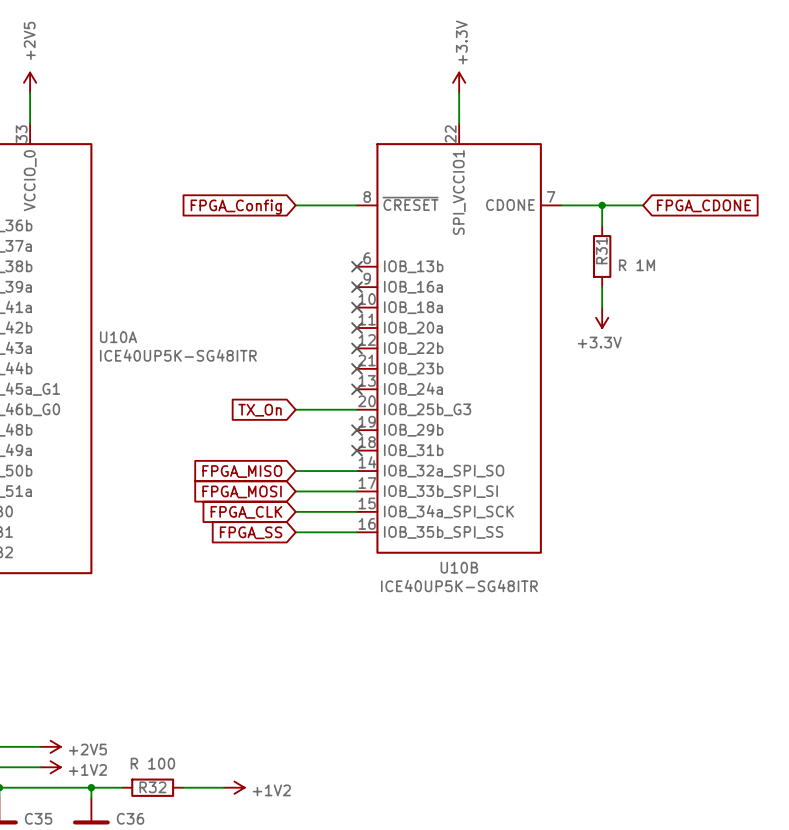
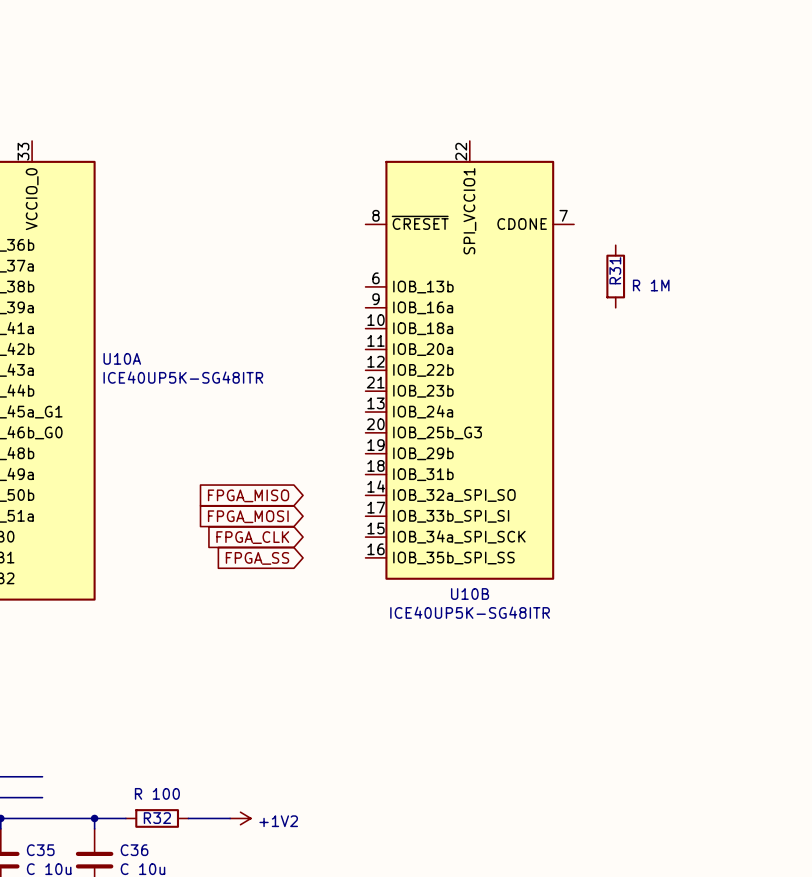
power symbol: +2V5 (30, 82) -> none
power symbol: +3.3V (459, 82) -> none
wire: (30, 93) (30, 123) -> none
wire: (459, 93) (459, 123) -> none
wire: (295, 205) (356, 205) -> none
wire: (561, 205) (643, 205) -> none
wire: (602, 205) (602, 225) -> none
junction: (602, 205) -> none
global label: FPGA_CDONE (703, 205) -> none
global label: FPGA_Config (236, 207) -> none
no-connect mark: (356, 266) -> none
no-connect mark: (356, 287) -> none
wire: (602, 287) (602, 307) -> none
no-connect mark: (356, 307) -> none
power symbol: +3.3V (602, 317) -> none
no-connect mark: (356, 328) -> none
no-connect mark: (356, 348) -> none
no-connect mark: (356, 368) -> none
no-connect mark: (356, 389) -> none
wire: (295, 409) (356, 409) -> none
global label: TX_On (260, 410) -> none
no-connect mark: (356, 430) -> none
no-connect mark: (356, 450) -> none
wire: (295, 471) (356, 471) -> none
wire: (295, 491) (356, 491) -> none
wire: (295, 511) (356, 511) -> none
wire: (295, 532) (356, 532) -> none
power symbol: +2V5 (50, 746) -> none
power symbol: +1V2 (50, 767) -> none

